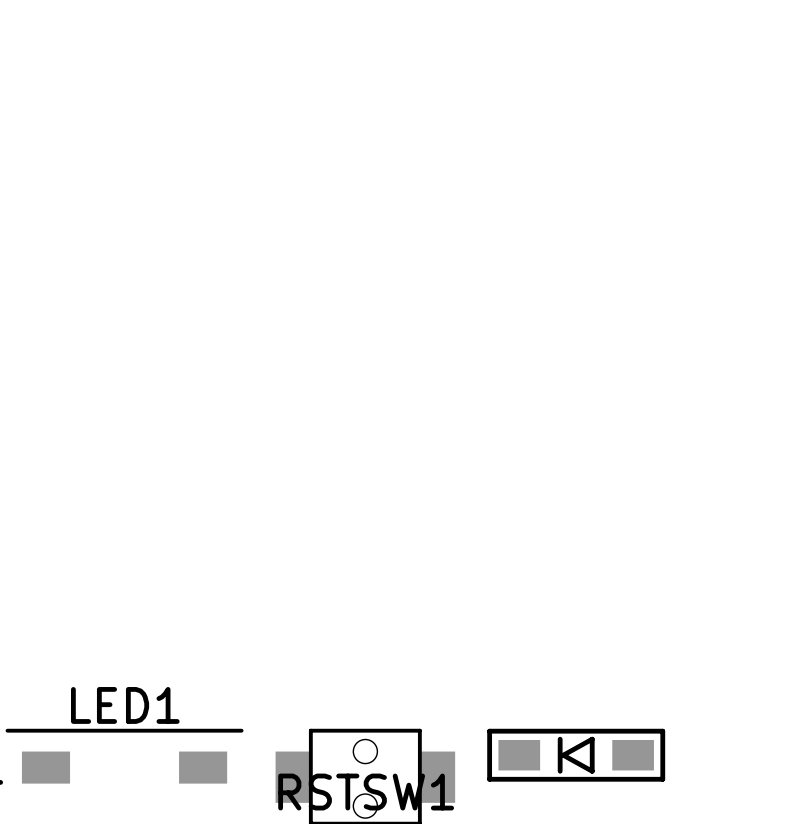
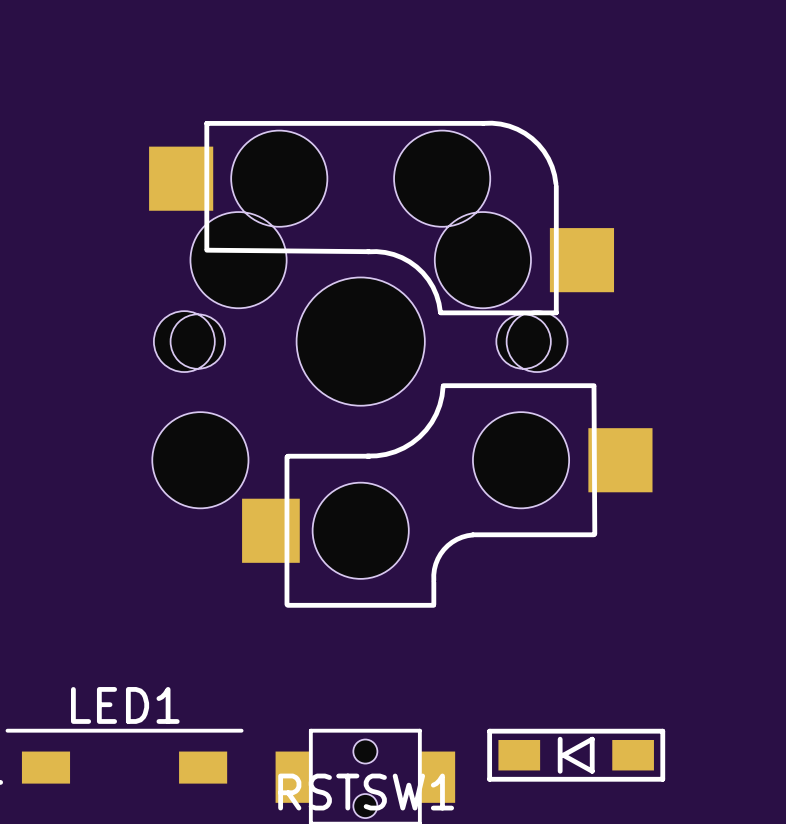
part: none -> (400, 364)

